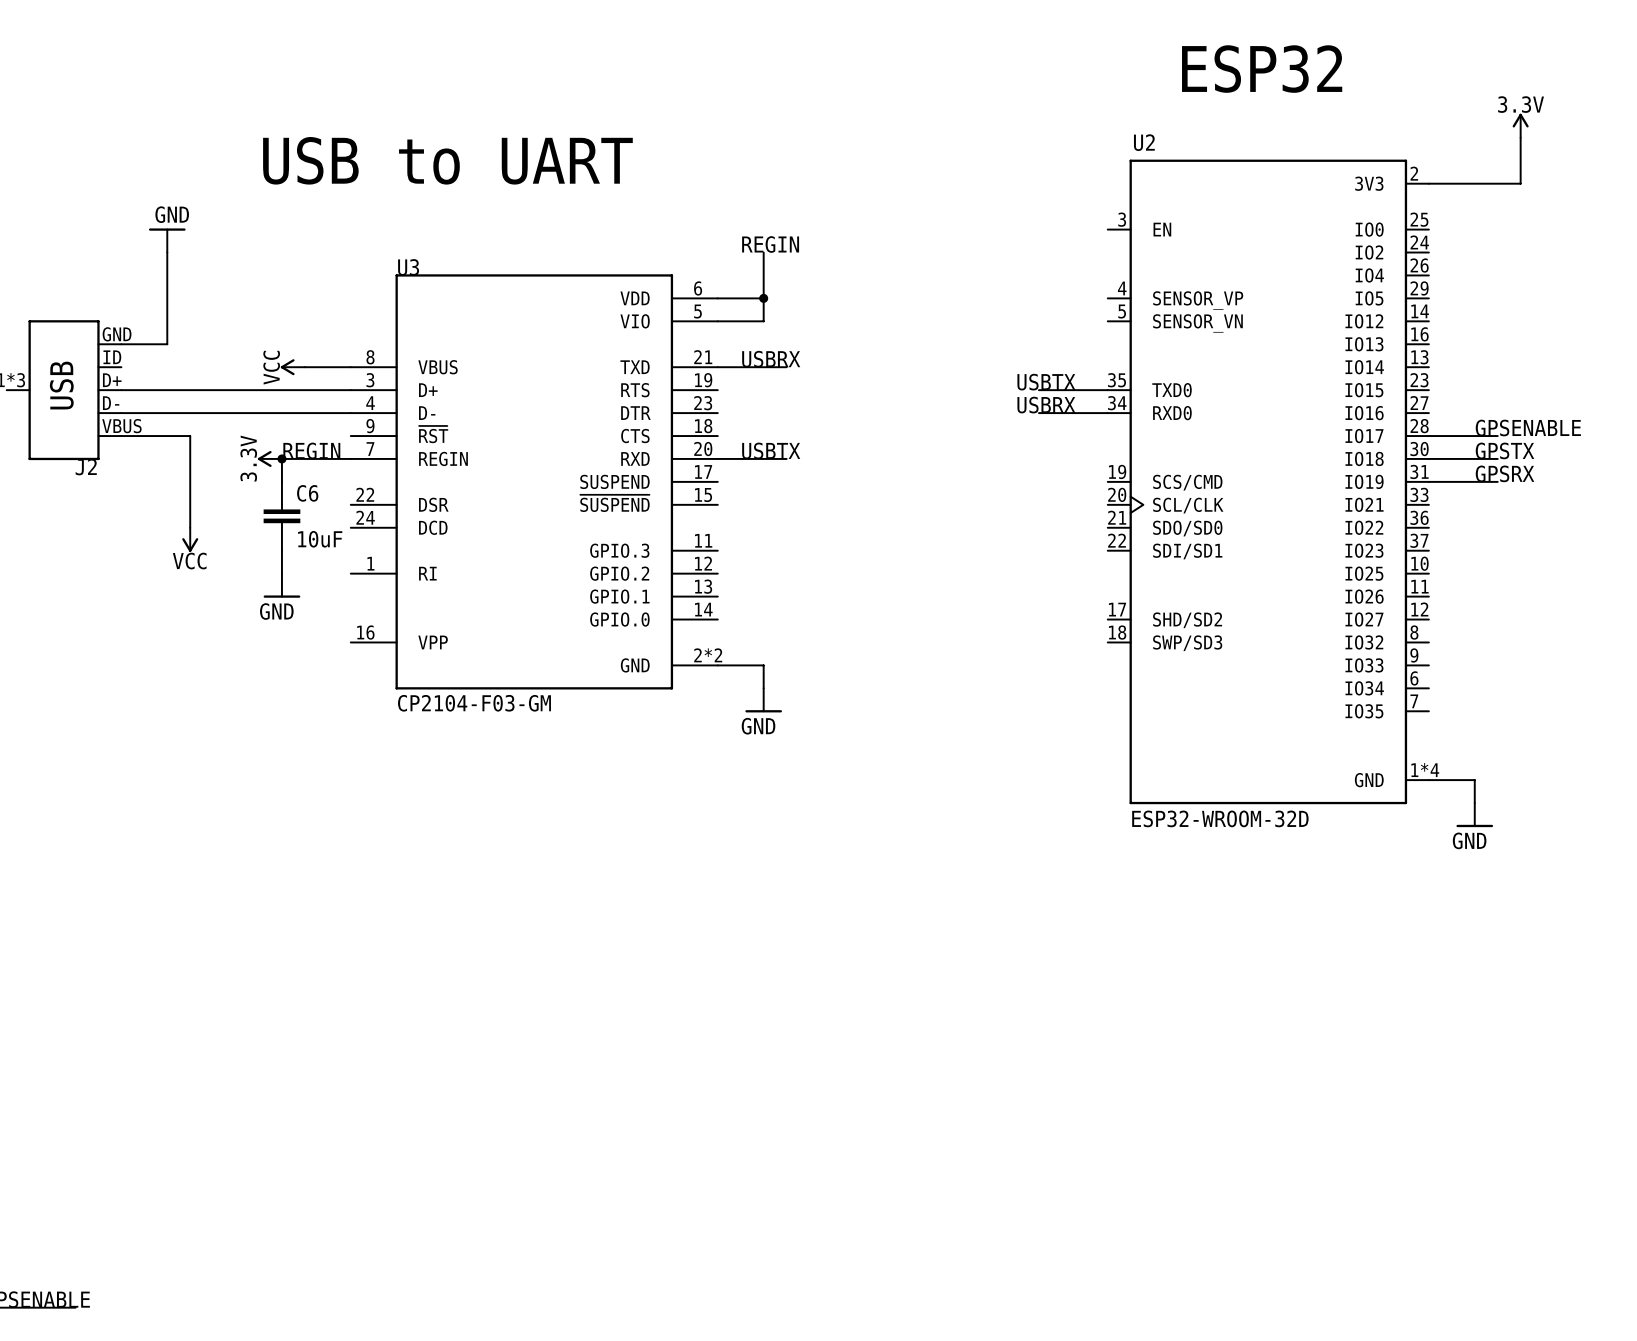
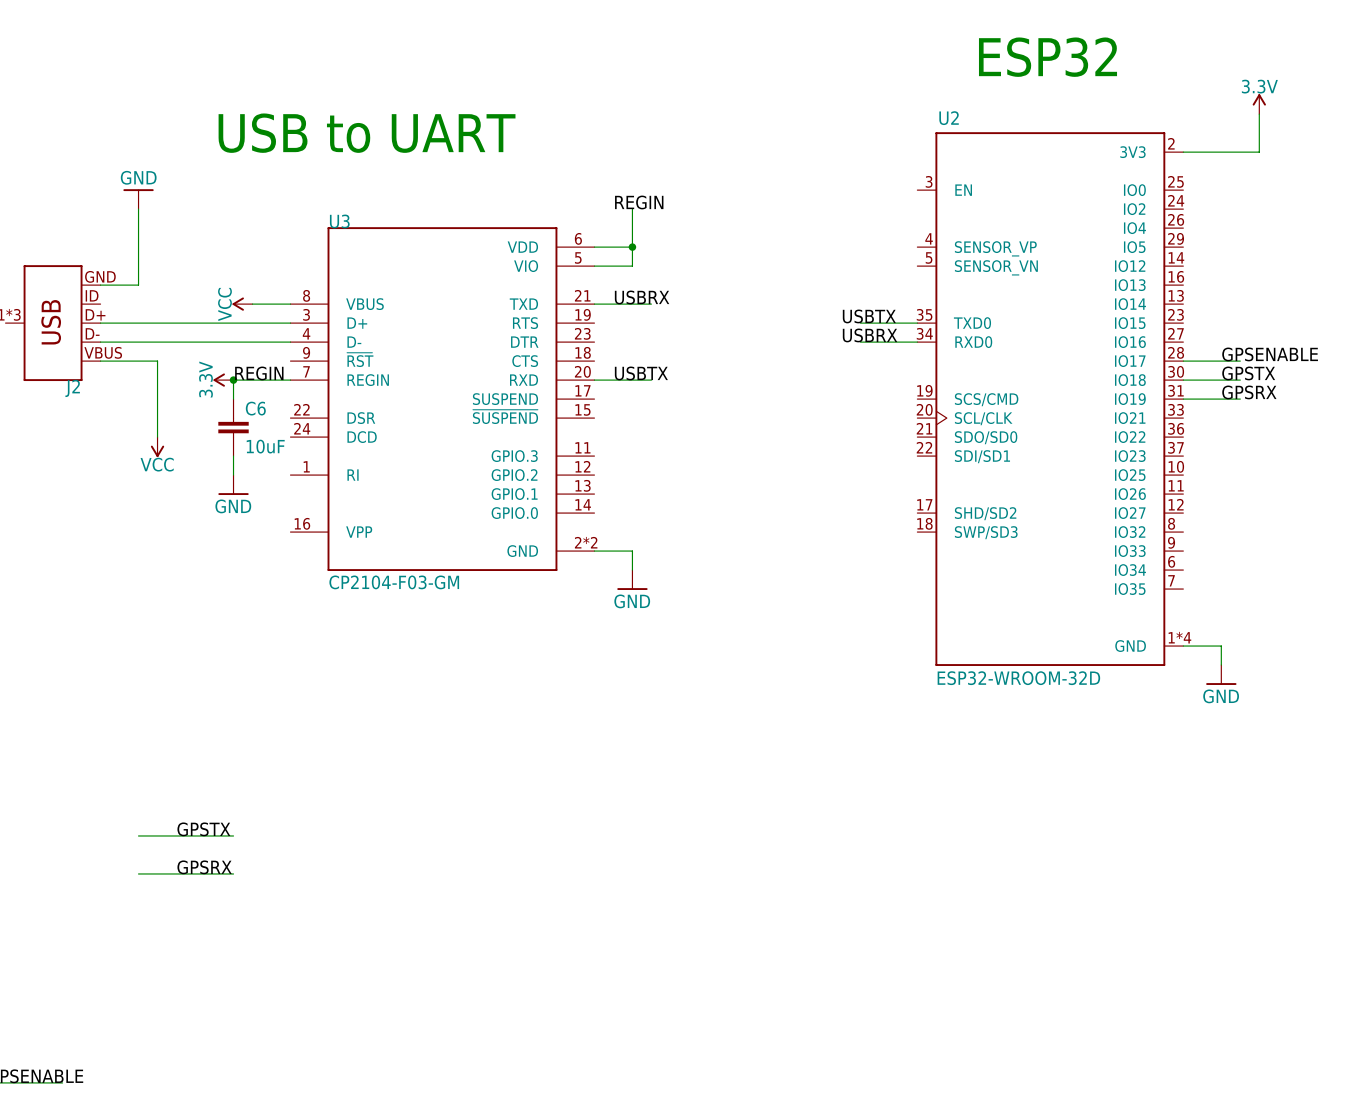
label: none -> GPSTX (203, 829)
wire: none -> (138, 835) (233, 835)
label: none -> GPSRX (204, 867)
wire: none -> (138, 873) (233, 873)

